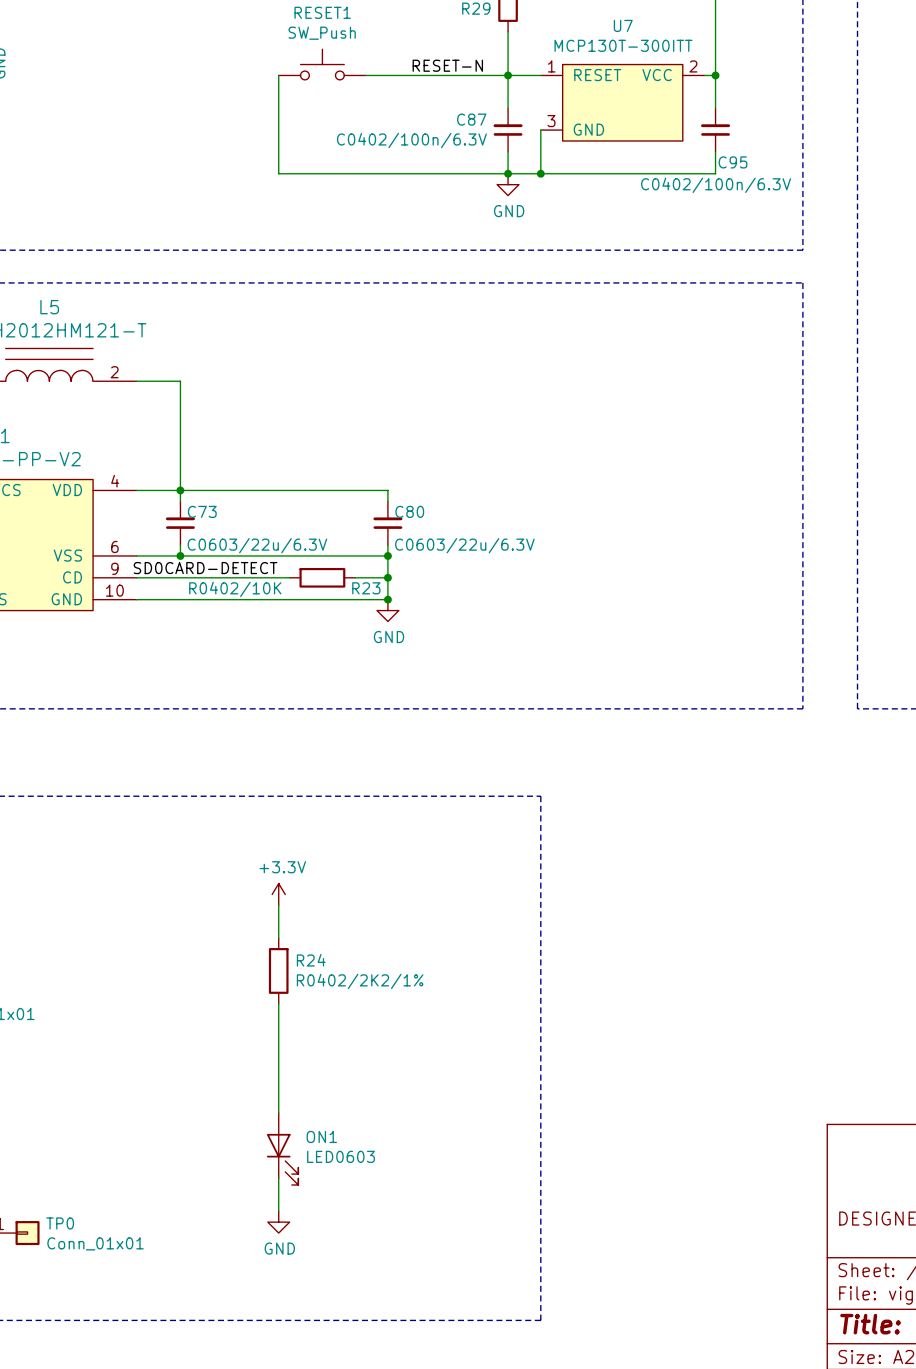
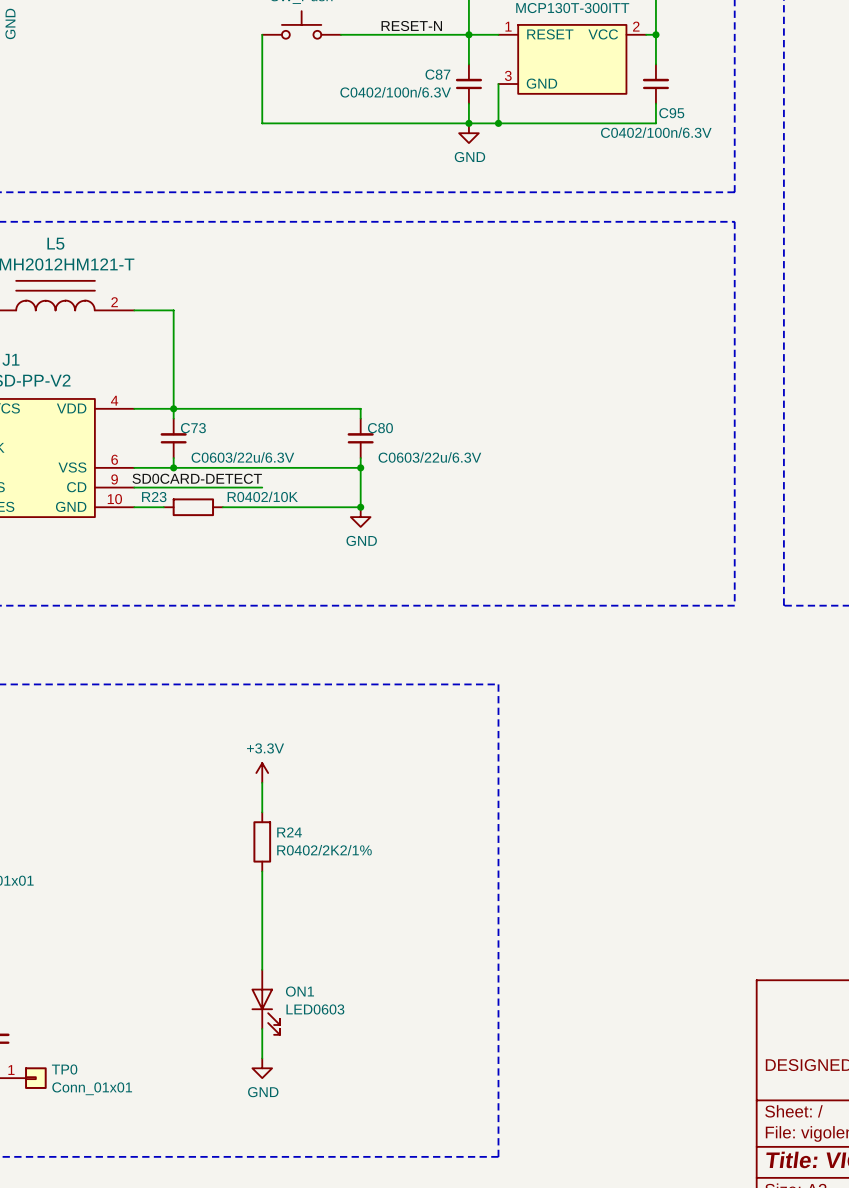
wire: (278, 577) (289, 577) -> none
R23 position: (322, 577) -> (193, 507)
wire: (355, 577) (387, 577) -> none
junction: (387, 577) -> none
R23 name position: R23 (366, 588) -> R23 (154, 497)
R23 value position: R0402/10K (235, 589) -> R0402/10K (262, 496)
wire: (169, 599) (235, 599) -> none

